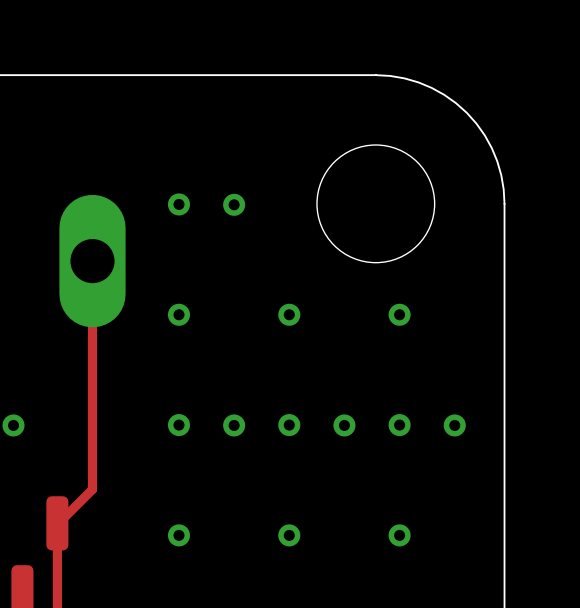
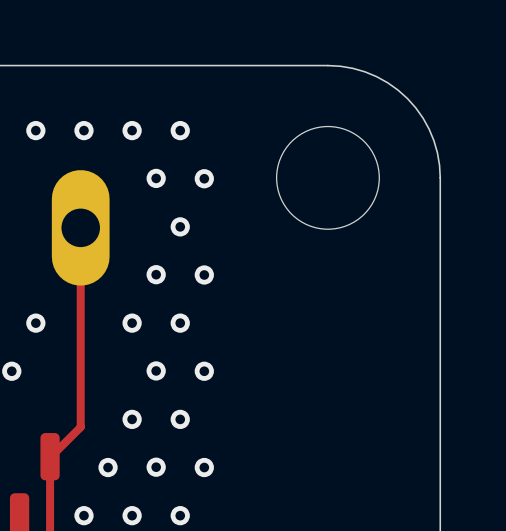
via: none -> (35, 130)
via: none -> (83, 130)
via: none -> (132, 130)
via: none -> (180, 130)
via: none -> (180, 226)
via: (289, 314) -> none
via: (399, 314) -> none
via: none -> (204, 275)
via: none -> (35, 323)
via: none -> (132, 323)
via: none -> (180, 323)
via: (289, 425) -> none
via: (344, 425) -> none
via: (399, 425) -> none
via: (454, 425) -> none
via: none -> (132, 419)
via: none -> (180, 419)
via: none -> (108, 467)
via: none -> (204, 467)
via: (289, 535) -> none
via: (399, 535) -> none
via: none -> (83, 515)
via: none -> (132, 515)
via: none -> (180, 515)

